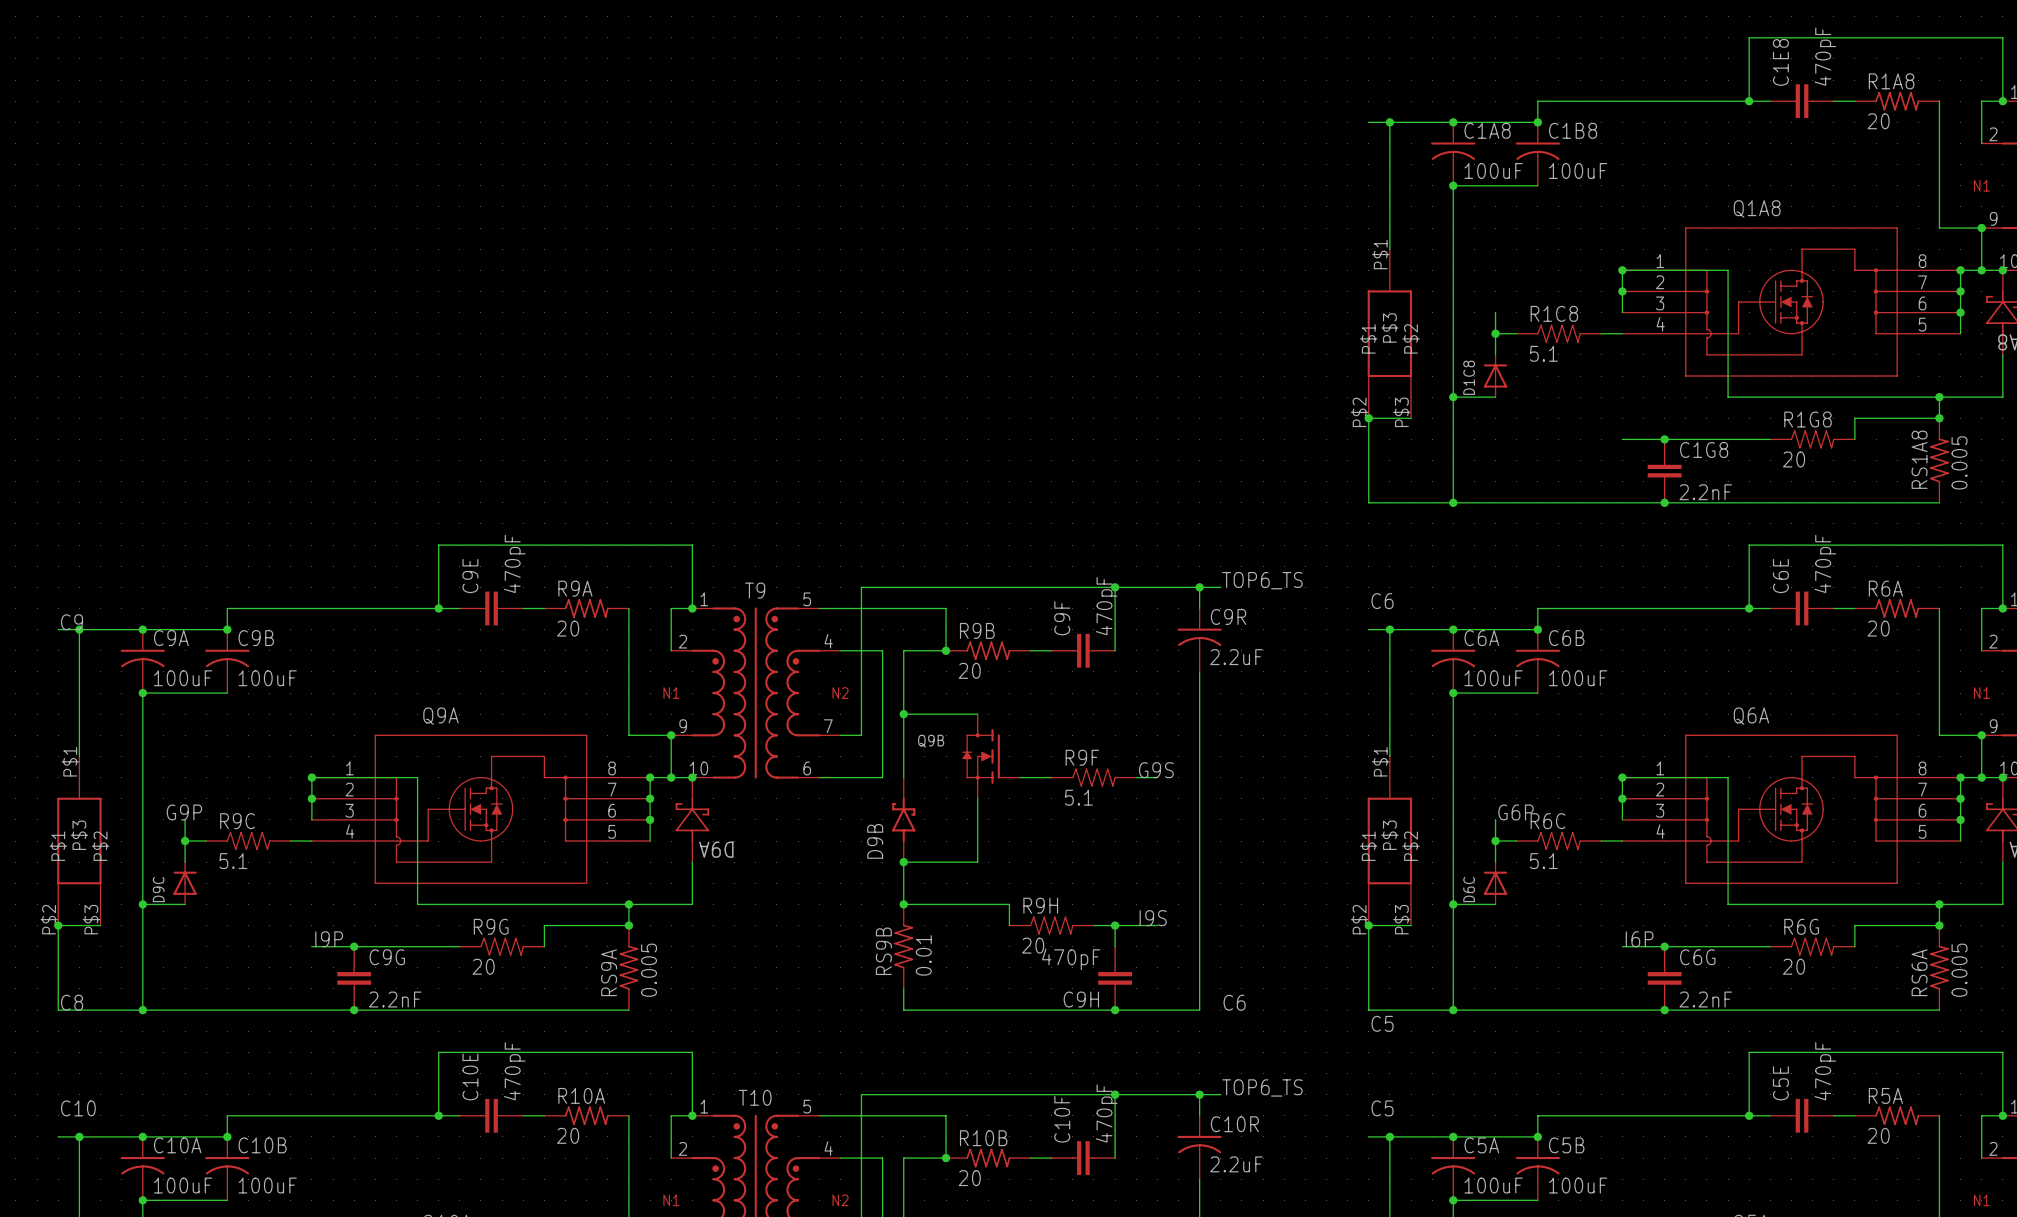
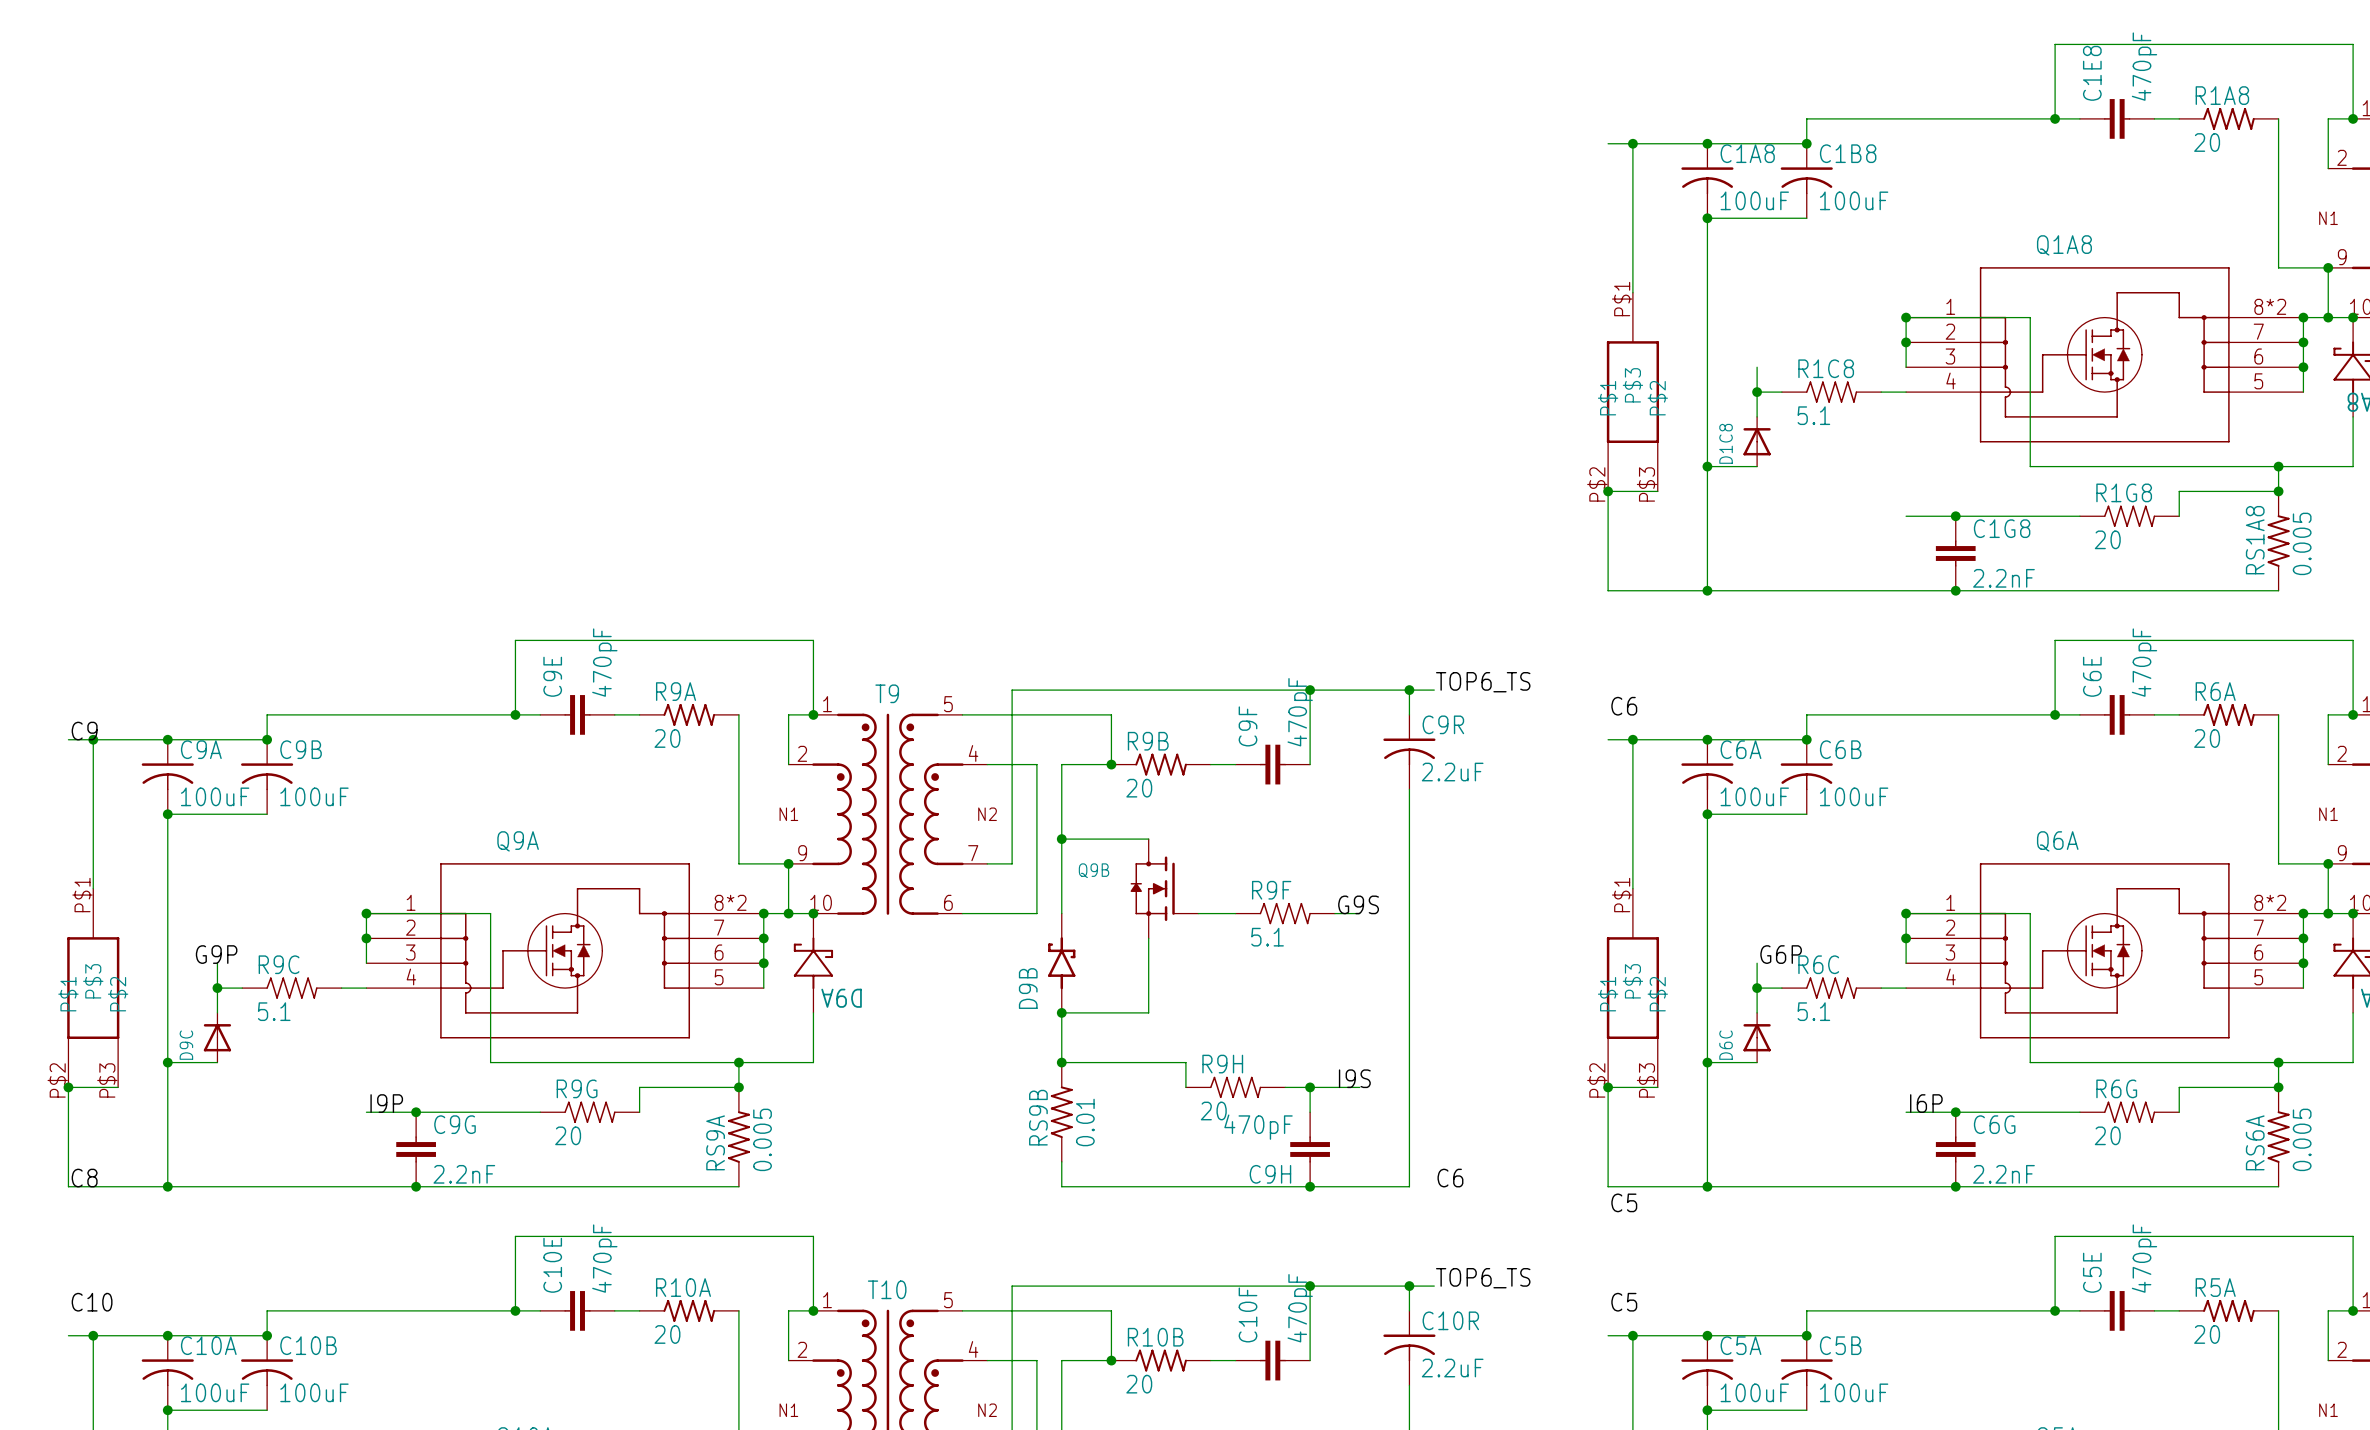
Q1A8 pin number: 8 (1922, 261) -> 8*2 (2270, 306)
Q9A pin number: 8 (612, 768) -> 8*2 (730, 902)
Q6A pin number: 8 (1922, 768) -> 8*2 (2270, 902)

